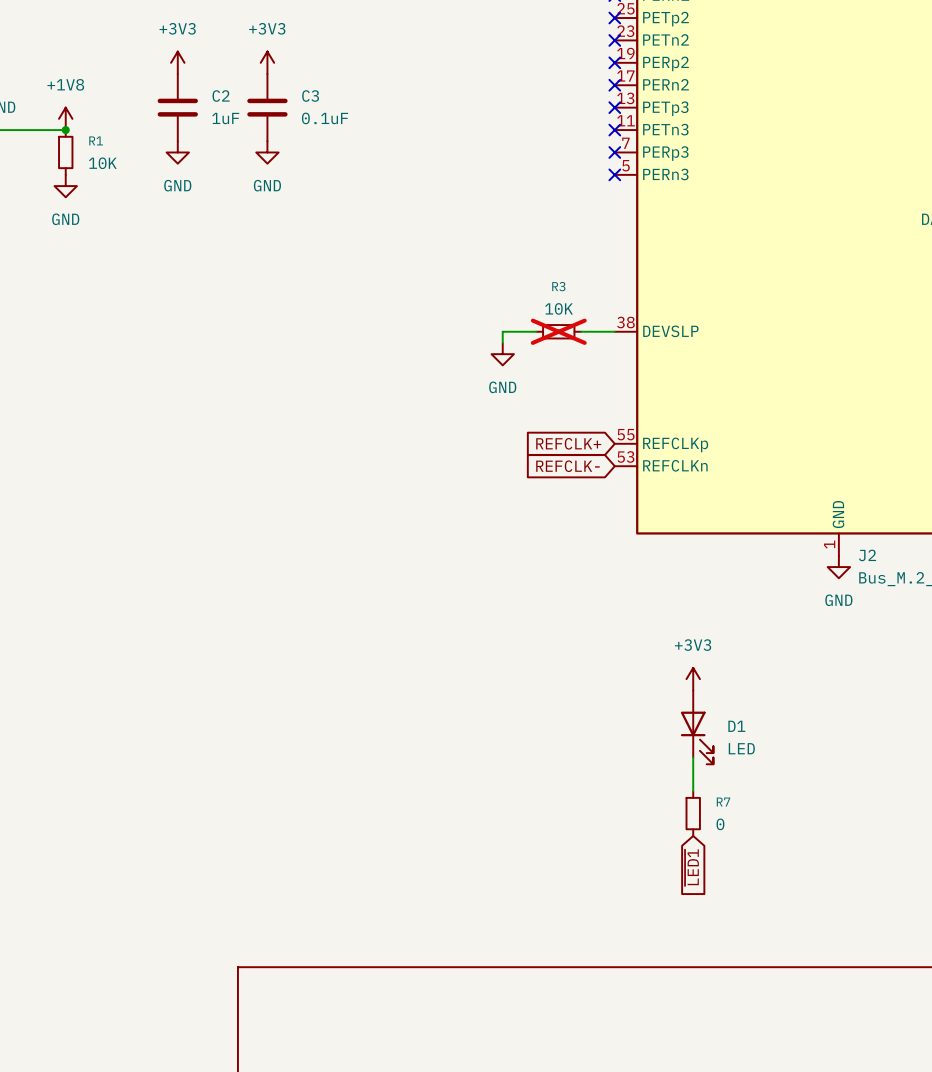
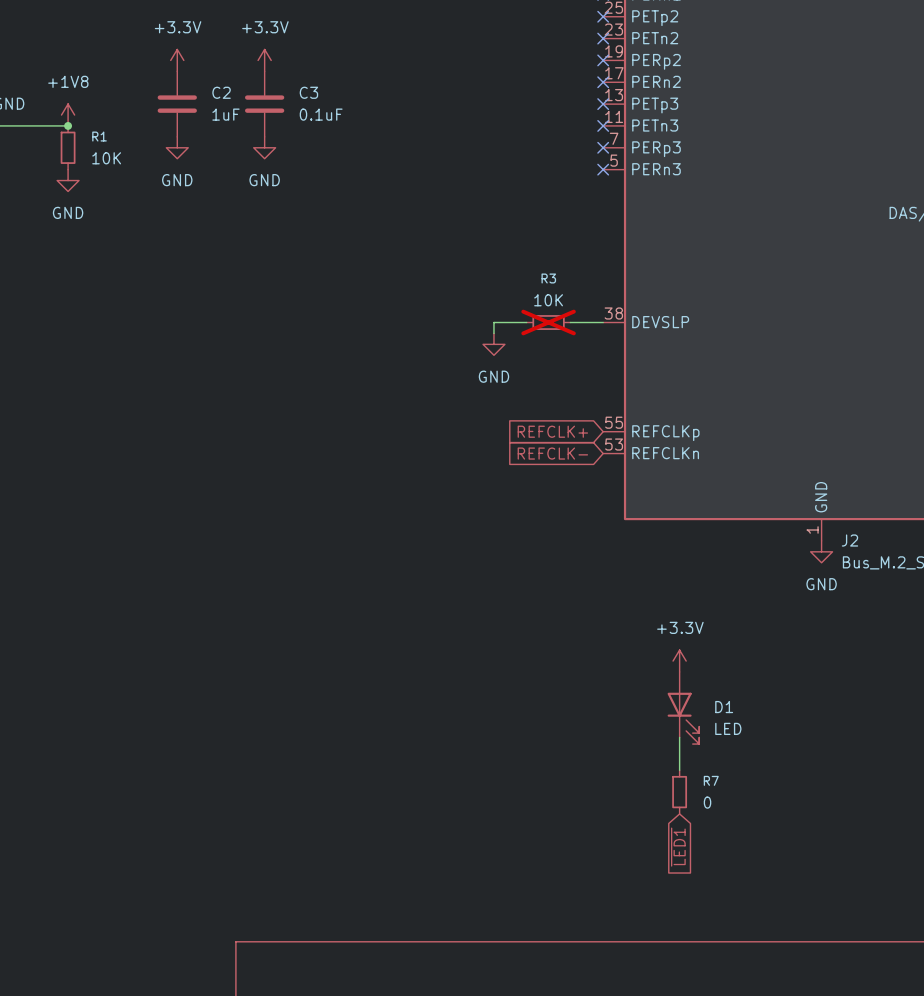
power symbol: +3V3 (177, 62) -> +3.3V (177, 60)
power symbol: +3V3 (267, 62) -> +3.3V (264, 60)
power symbol: +3V3 (693, 679) -> +3.3V (679, 661)

